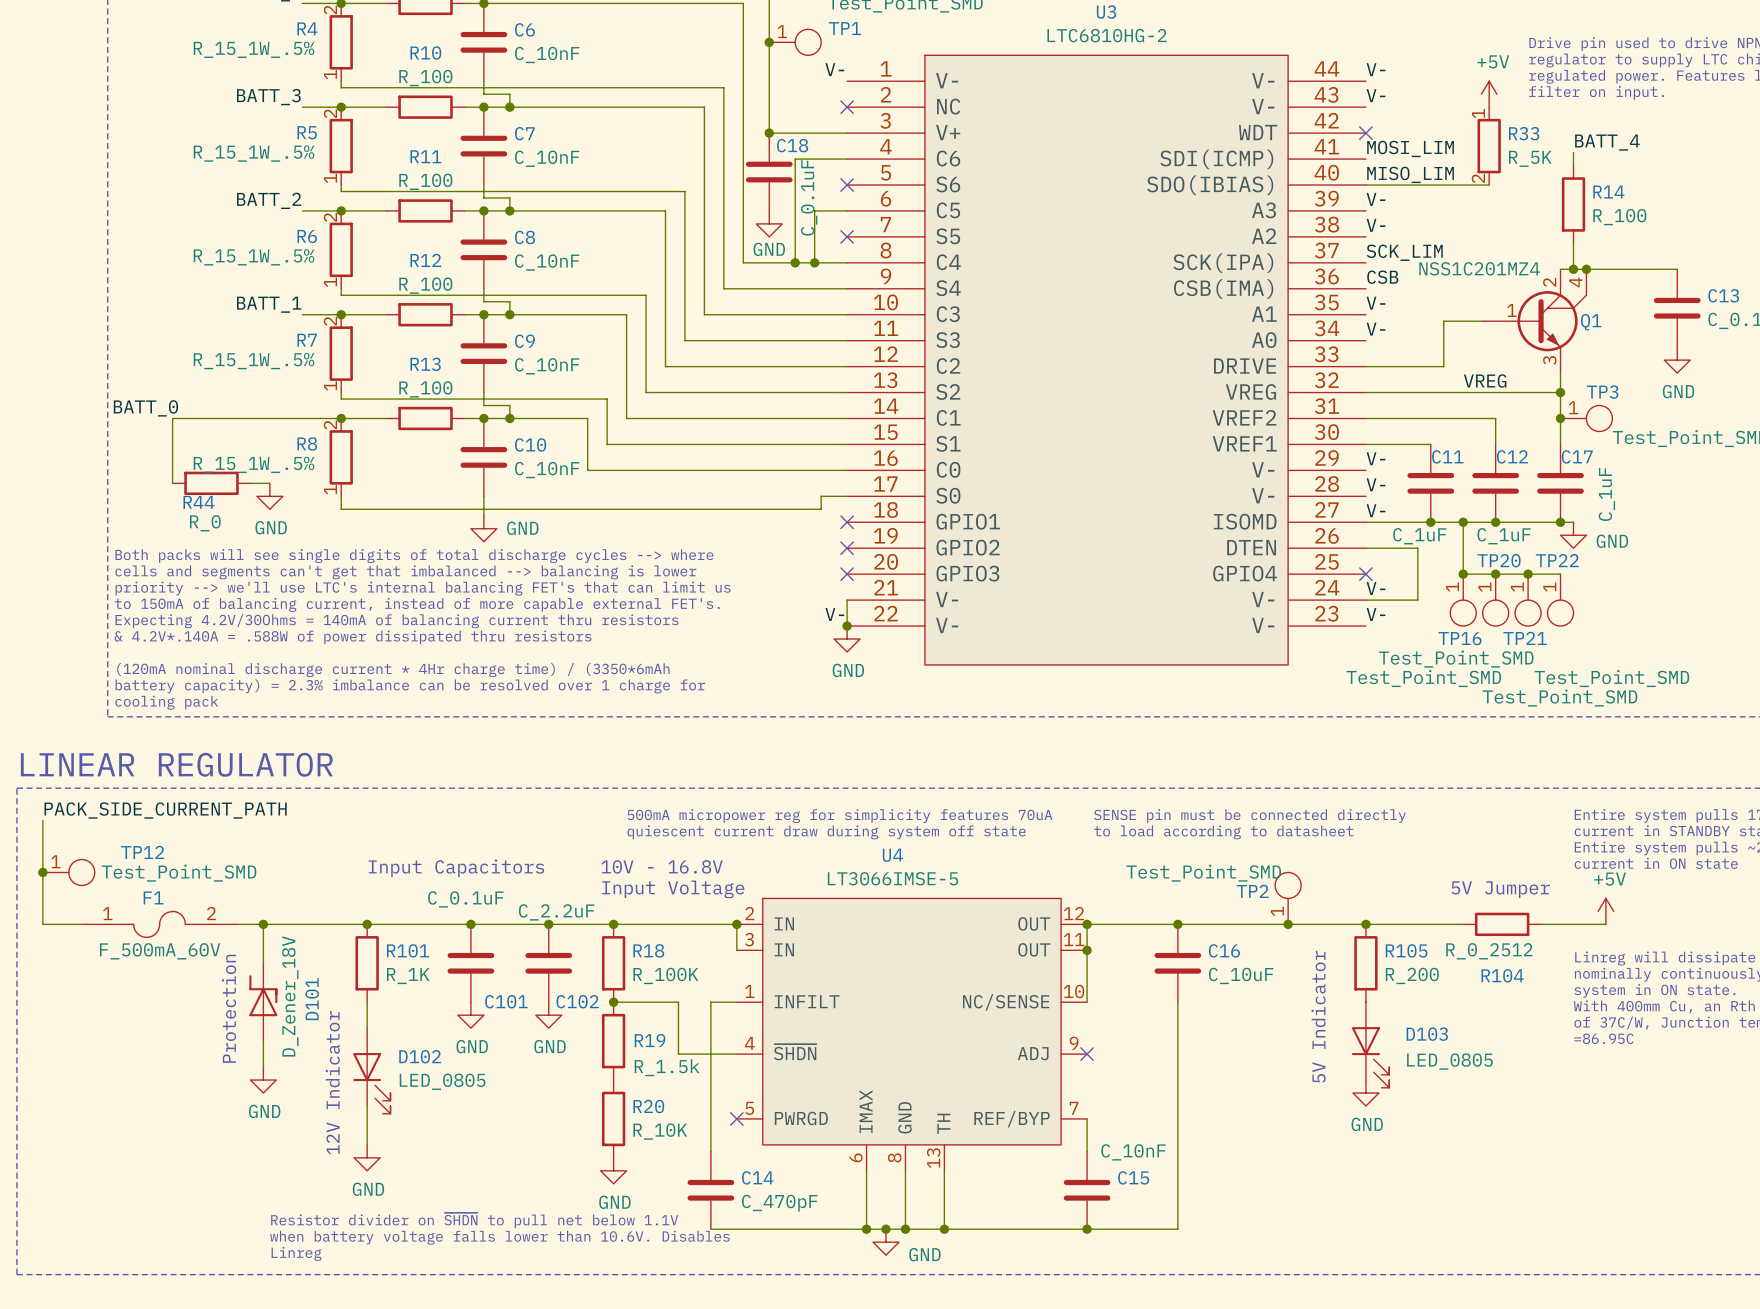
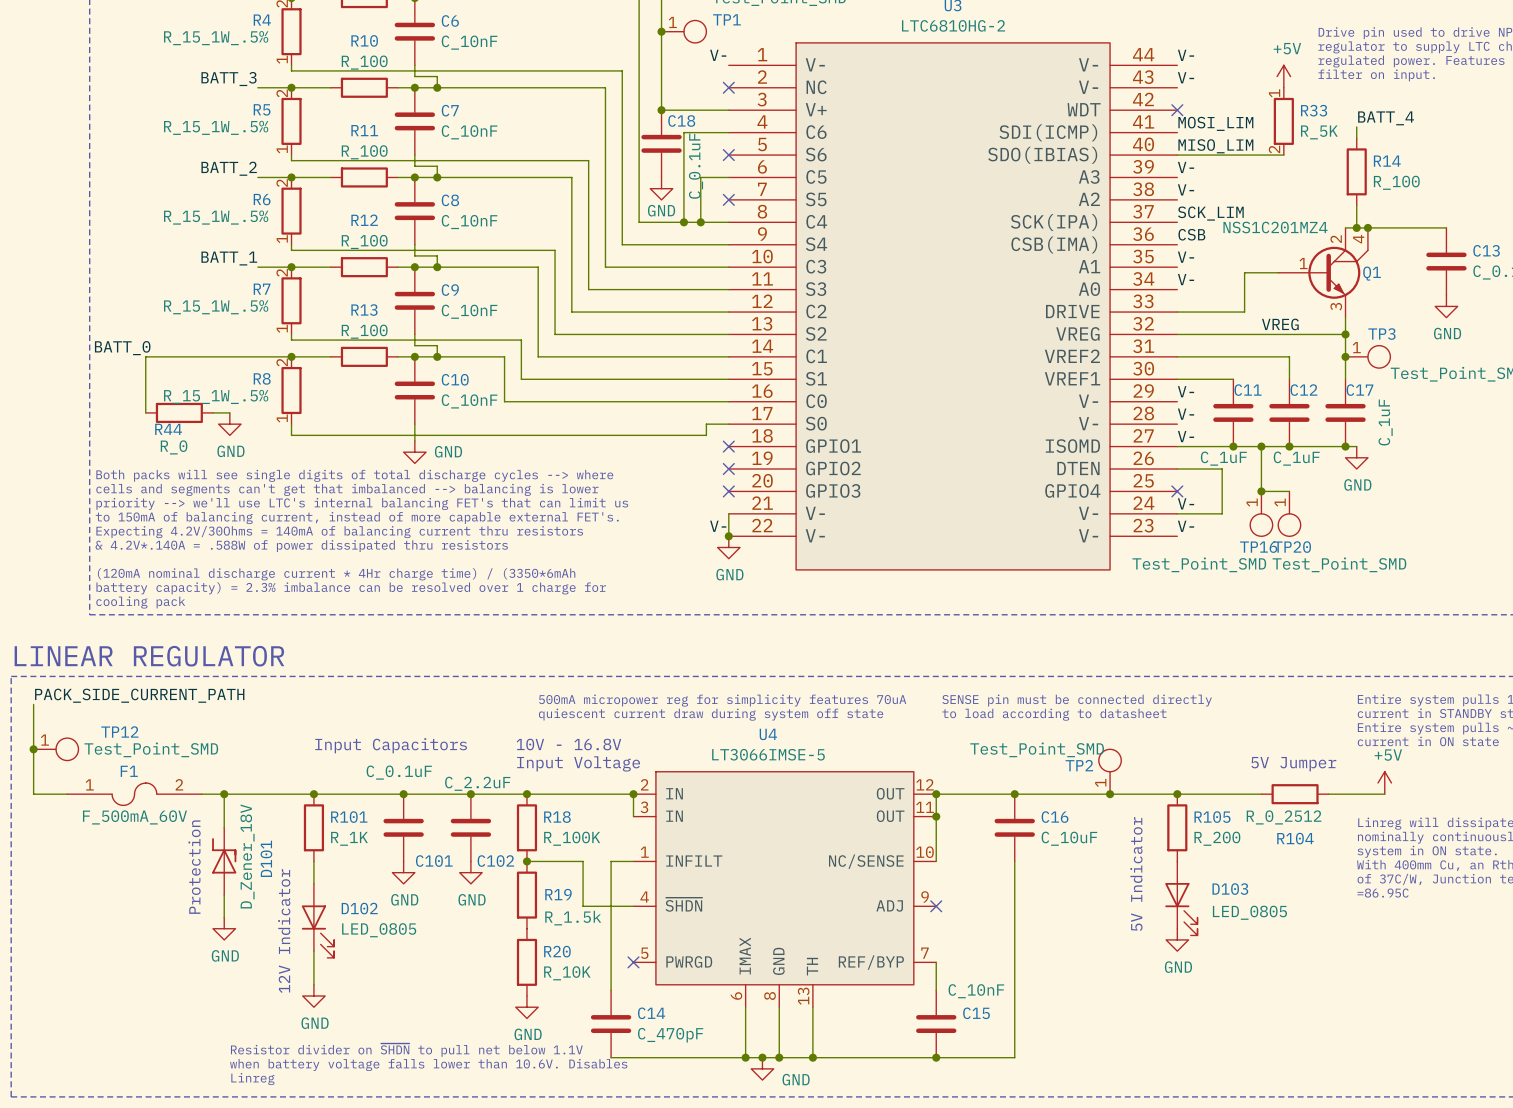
power symbol text position: GND (1612, 541) -> GND (1357, 484)
TP20 name position: TP20 (1499, 560) -> TP20 (1292, 547)
wire: (1495, 574) (1560, 574) -> none
junction: (1495, 574) -> none
junction: (1528, 574) -> none
TP21: Test_Point_SMD (1528, 600) -> none
TP22: Test_Point_SMD (1560, 600) -> none
TP16 value position: Test_Point_SMD (1423, 678) -> Test_Point_SMD (1199, 564)
TP20 value position: Test_Point_SMD (1560, 698) -> Test_Point_SMD (1339, 564)

